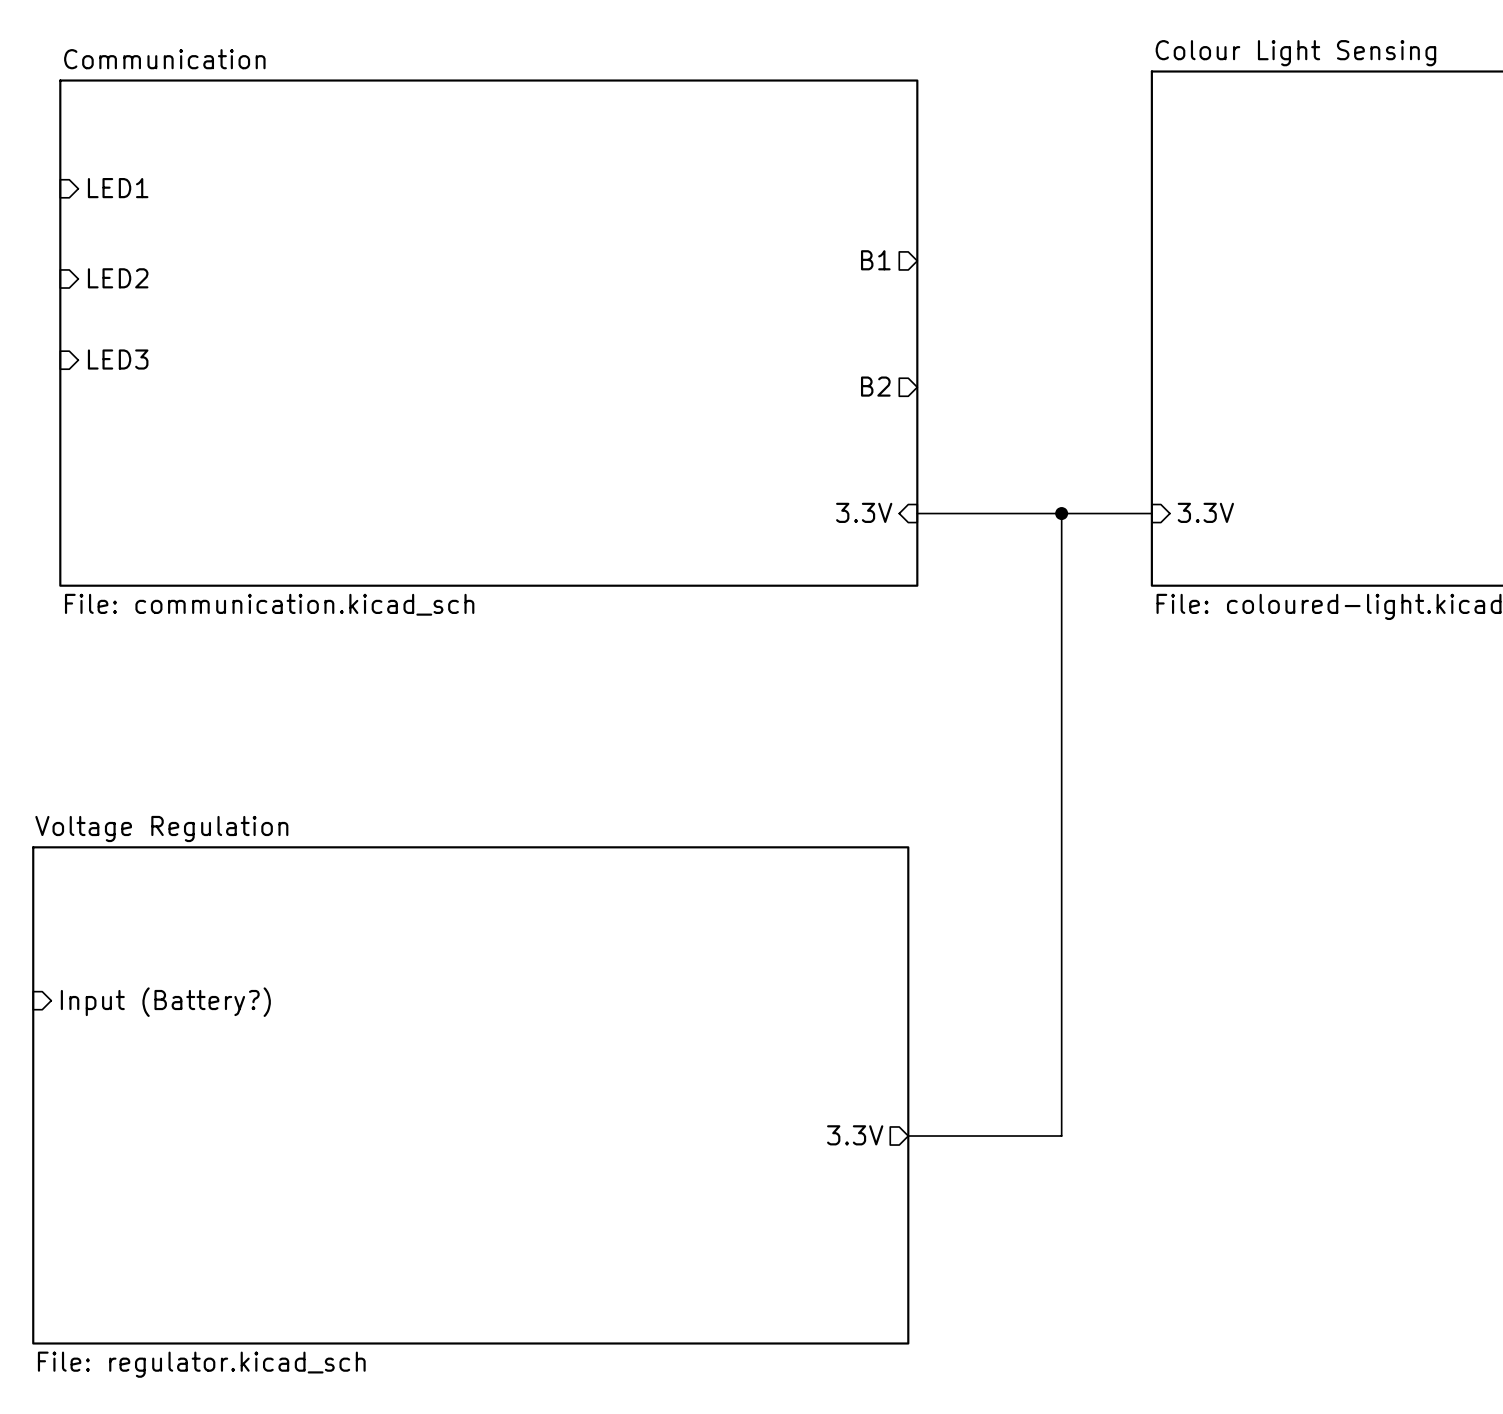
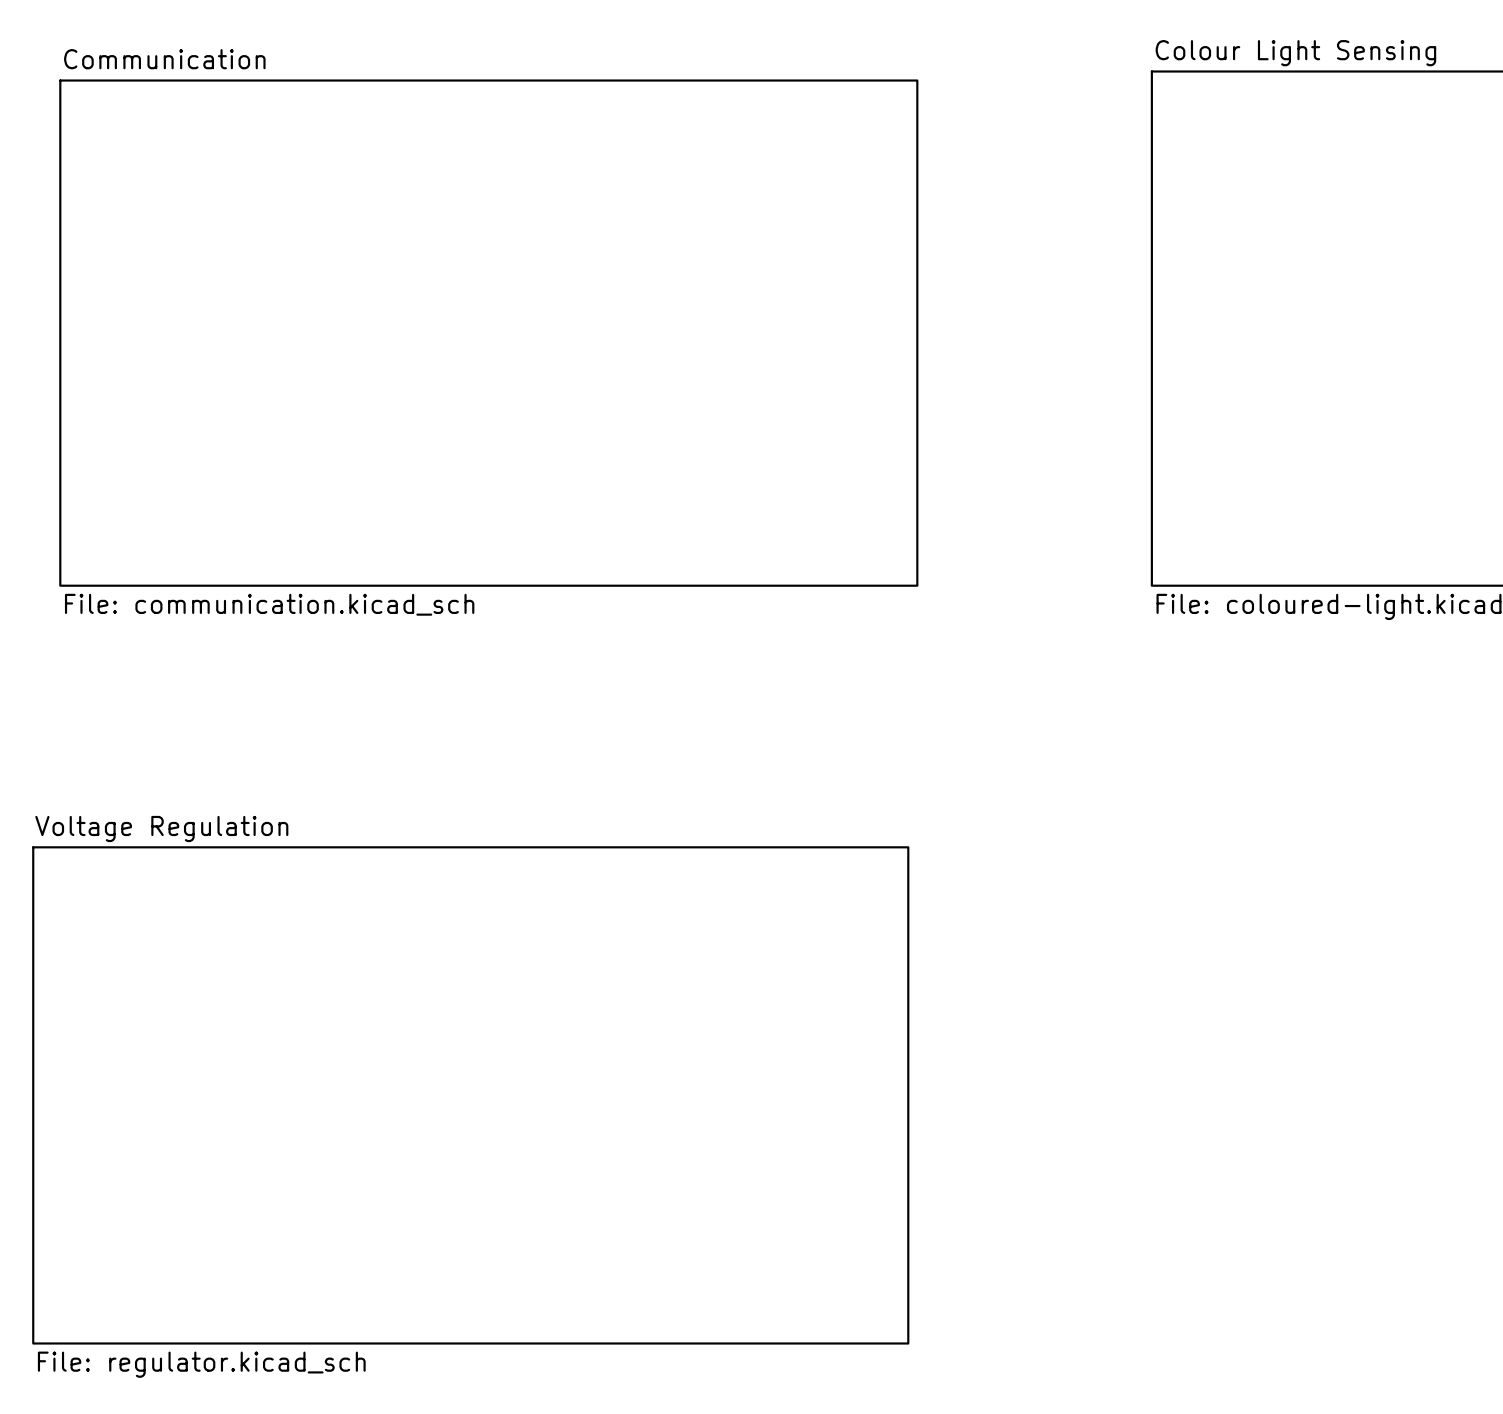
sheet pin: LED1 (118, 188) -> none
sheet pin: B1 (875, 260) -> none
sheet pin: LED2 (118, 278) -> none
sheet pin: LED3 (118, 359) -> none
sheet pin: B2 (875, 386) -> none
sheet pin: 3.3V (864, 512) -> none
sheet pin: 3.3V (1205, 512) -> none
wire: (917, 513) (1151, 513) -> none
wire: (1061, 513) (1061, 1136) (908, 1136) -> none
junction: (1061, 513) -> none
sheet pin: Input (Battery?) (165, 1002) -> none
sheet pin: 3.3V (855, 1135) -> none

